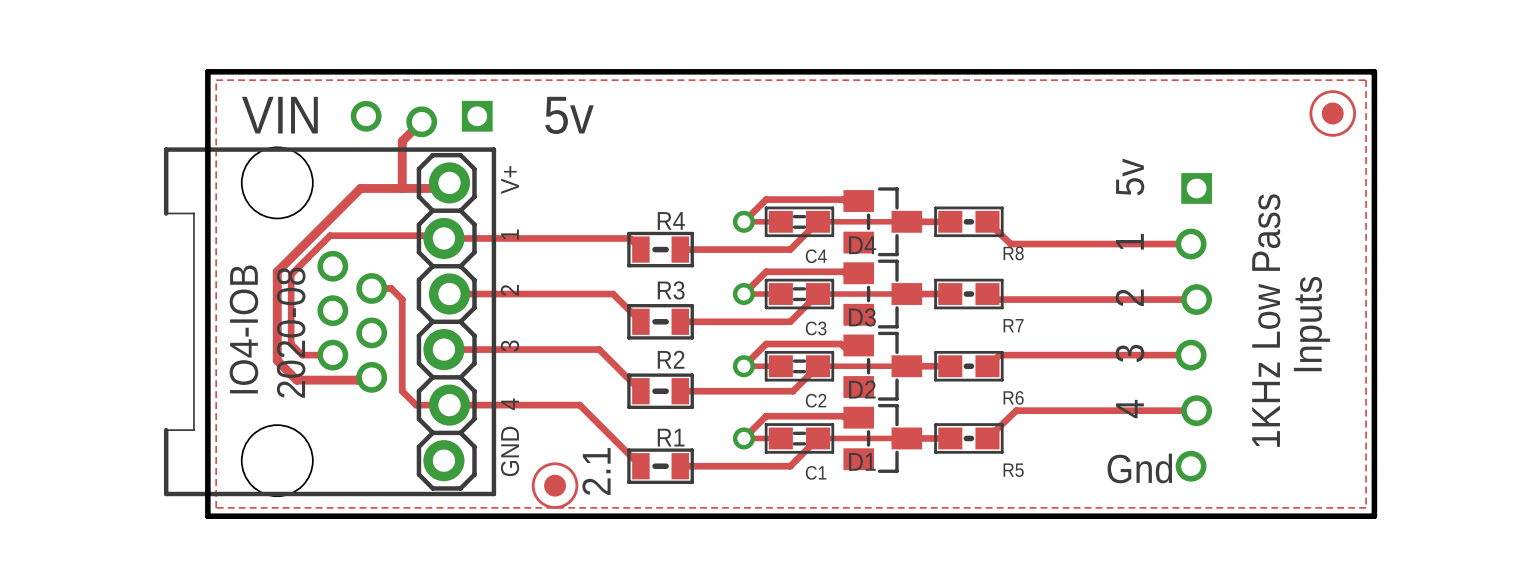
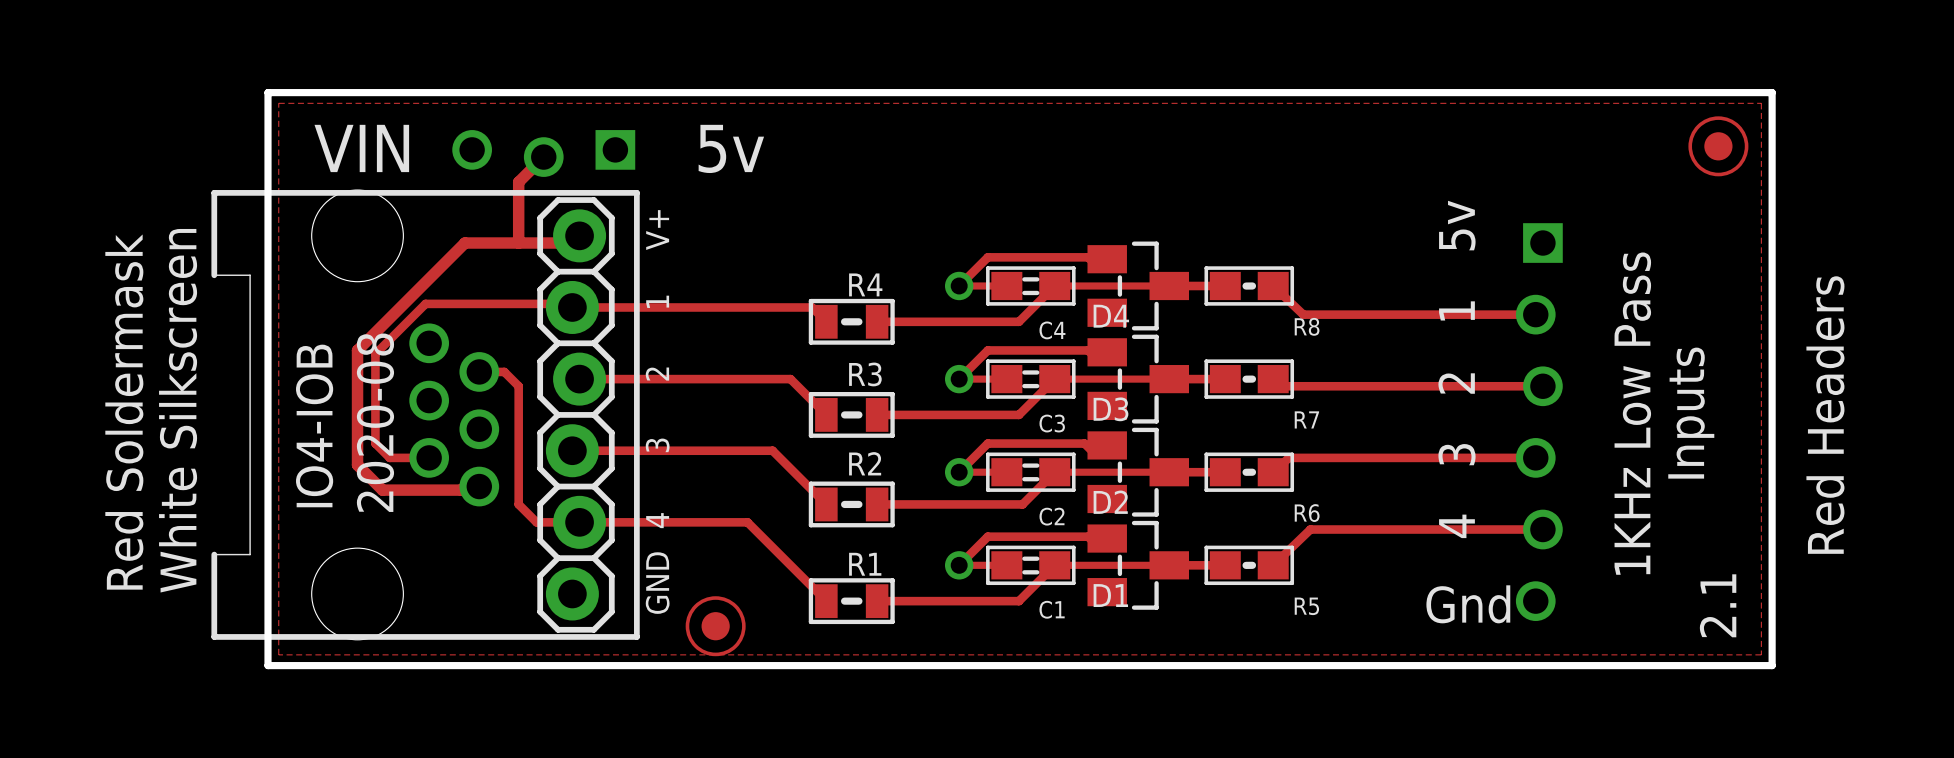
text: none -> Red Soldermask (124, 412)
text: none -> Red Headers (1825, 415)
text: none -> White Silkscreen (178, 410)
text: 2.1 (596, 471) -> none
text: none -> 2.1 (1718, 605)

